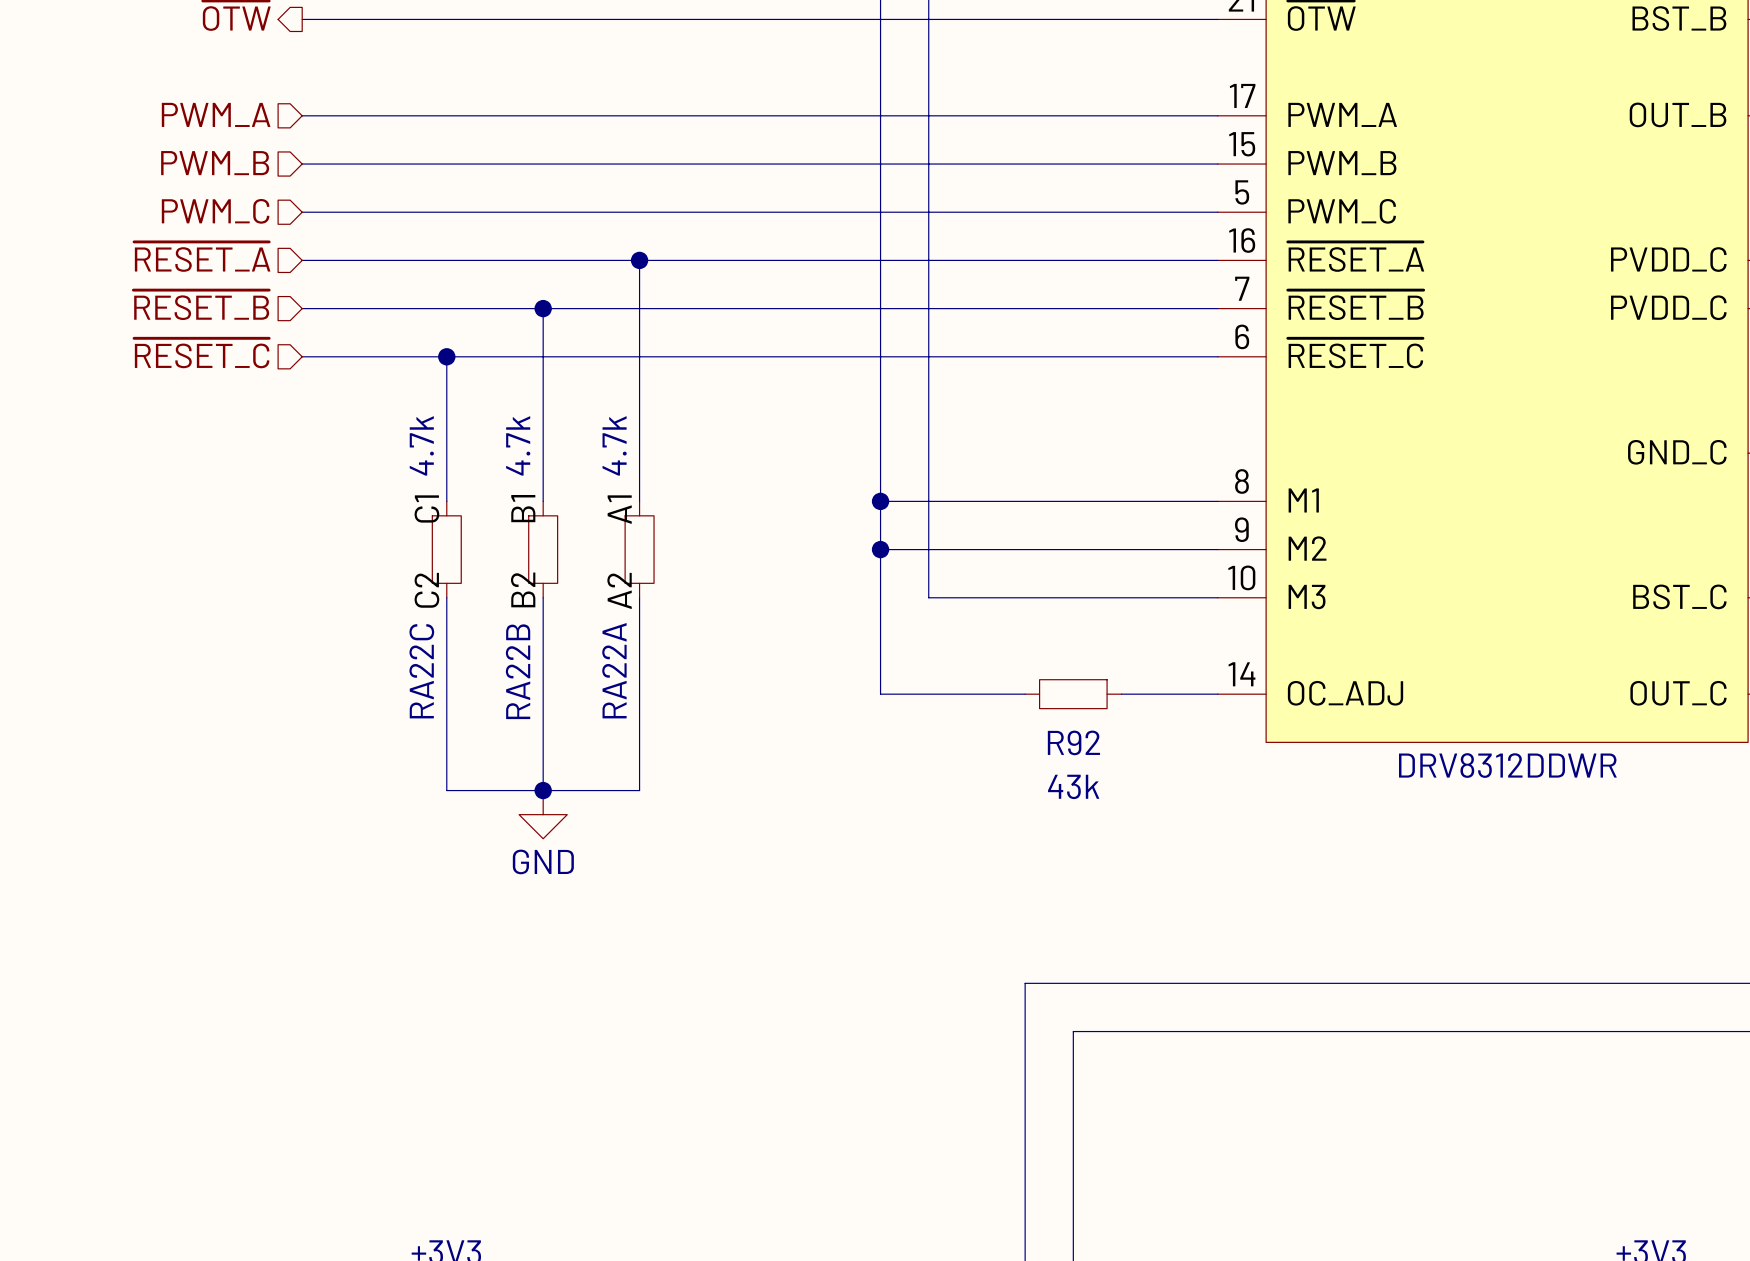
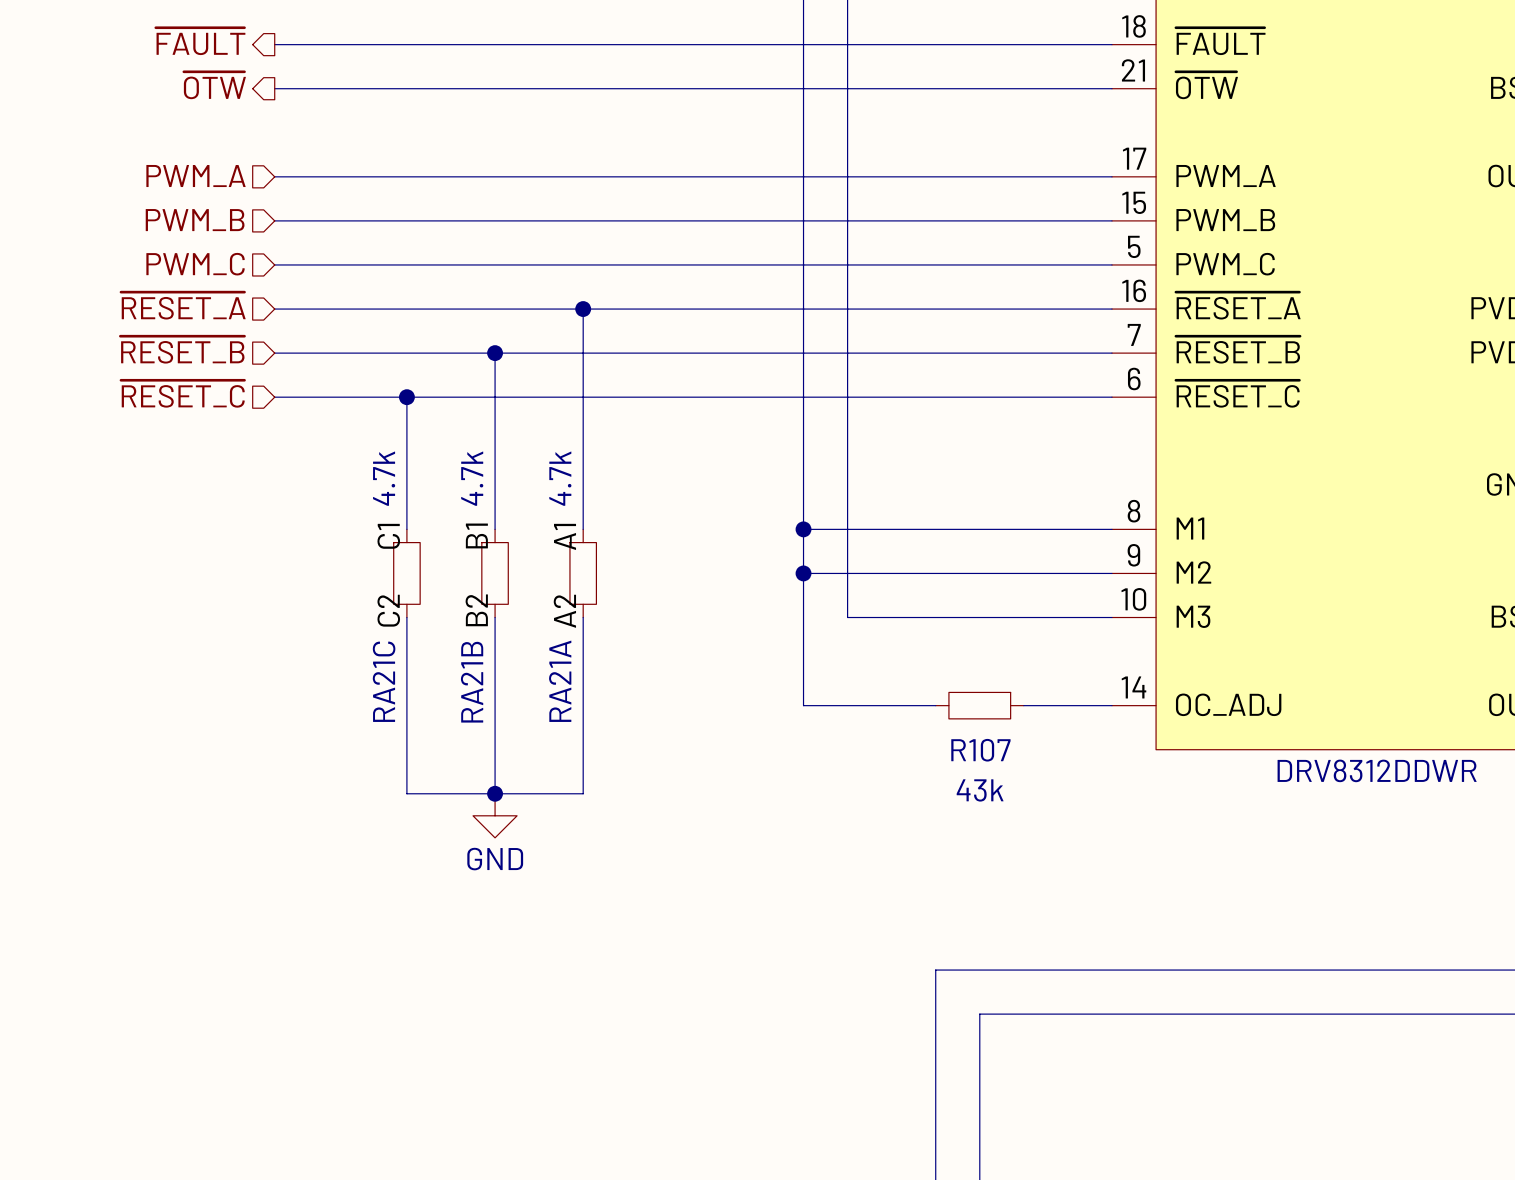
RA22A name: RA22A (614, 670) -> RA21A (560, 681)
RA22C name: RA22C (421, 671) -> RA21C (384, 681)
RA22B name: RA22B (518, 671) -> RA21B (472, 682)
R92 name: R92 (1073, 742) -> R107 (980, 750)

